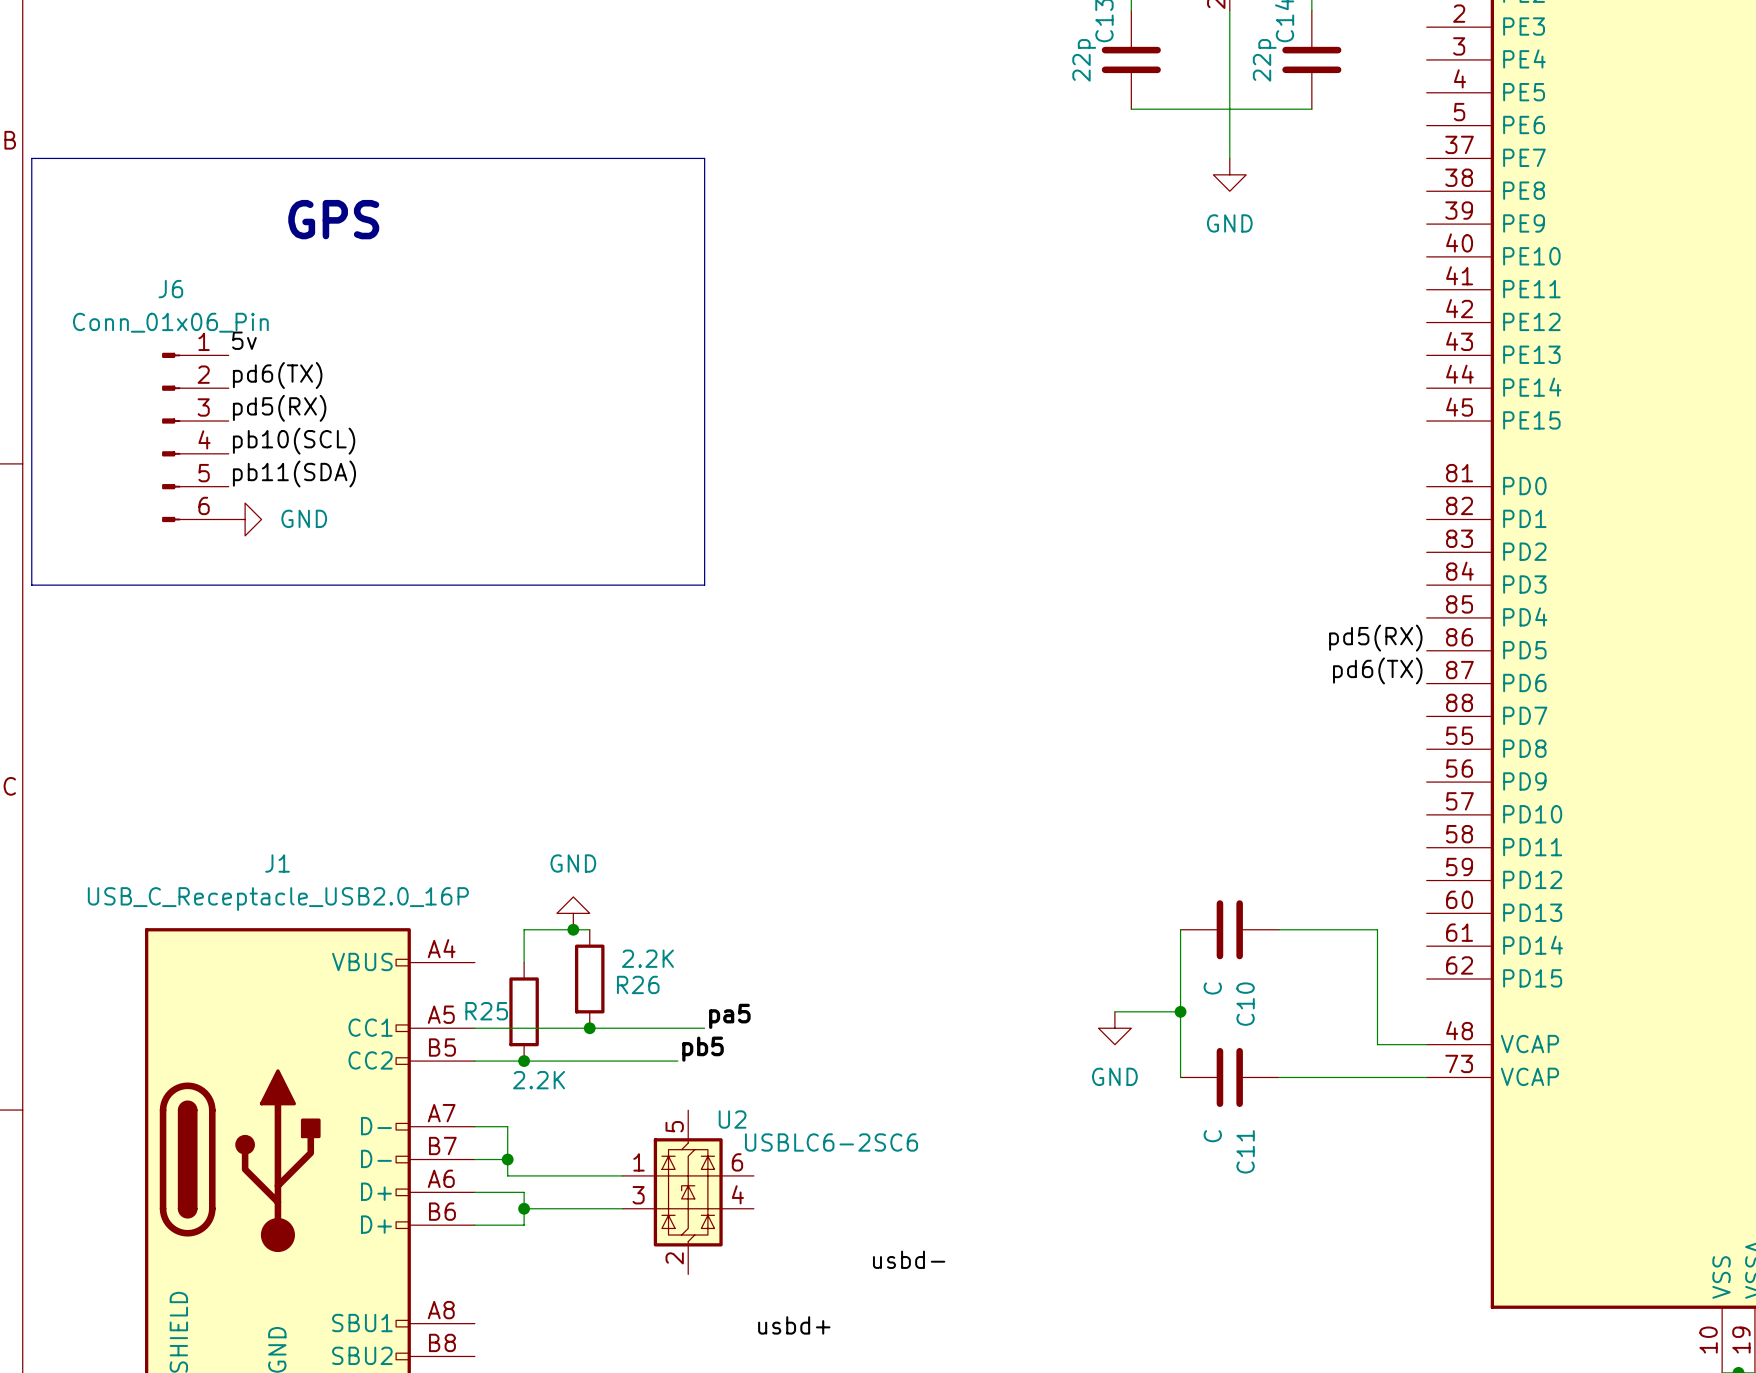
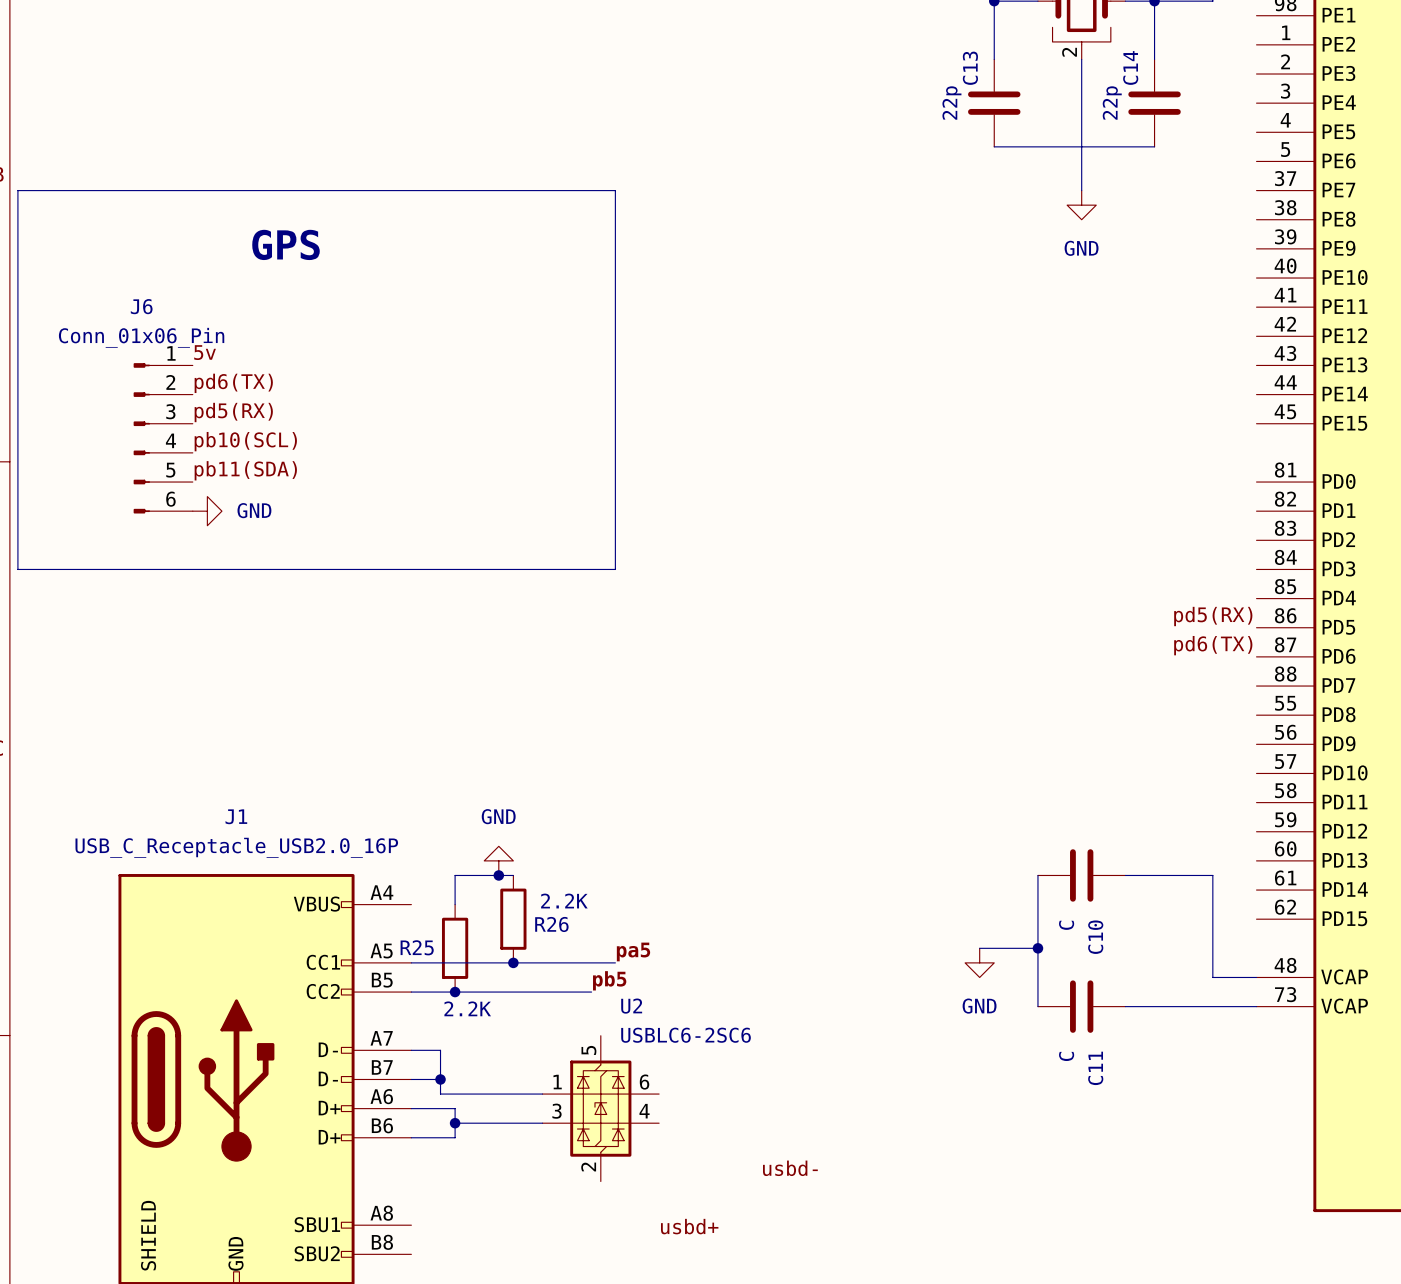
U2 name position: U2 (732, 1119) -> U2 (631, 1006)
U2 value position: USBLC6-2SC6 (831, 1142) -> USBLC6-2SC6 (686, 1035)

